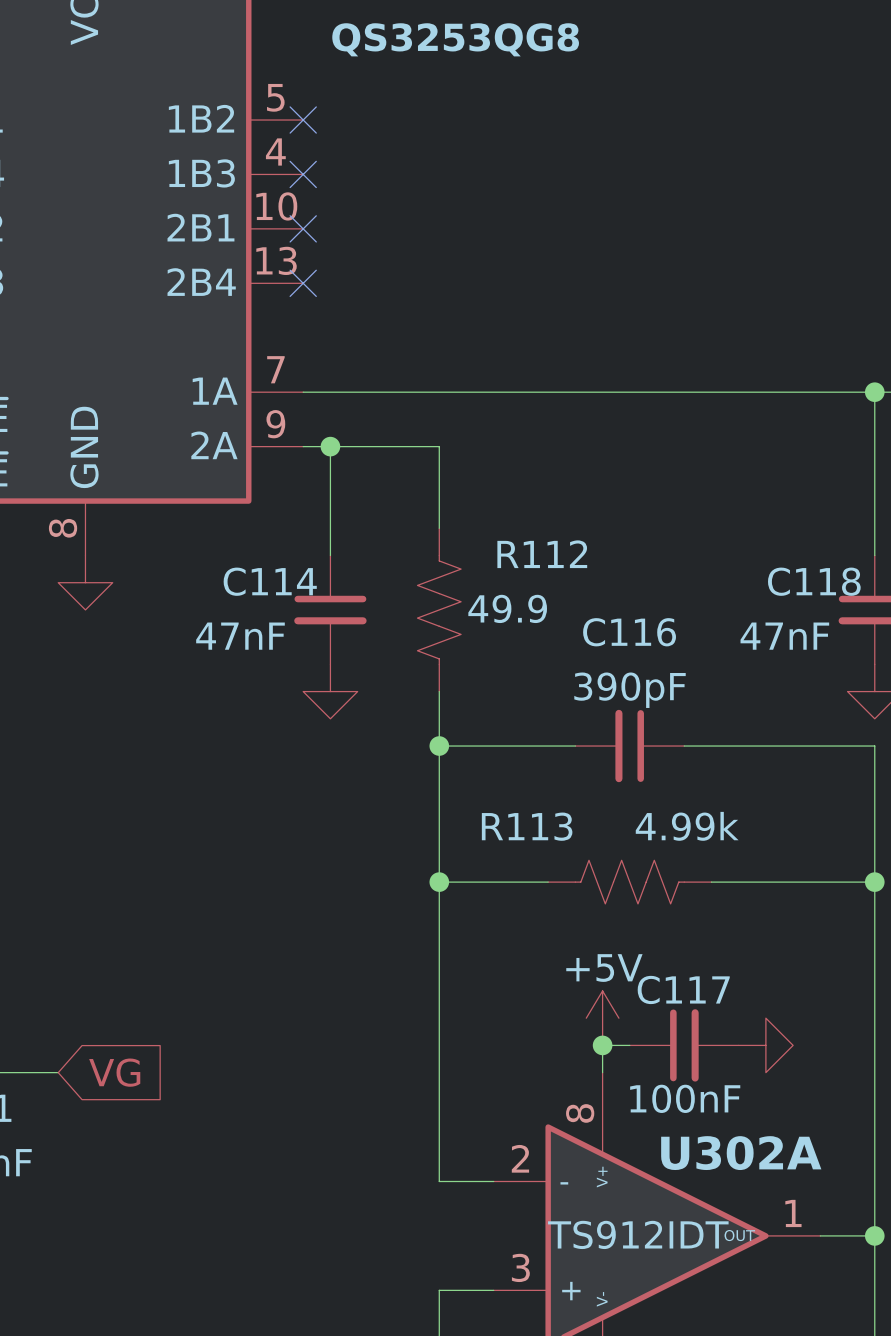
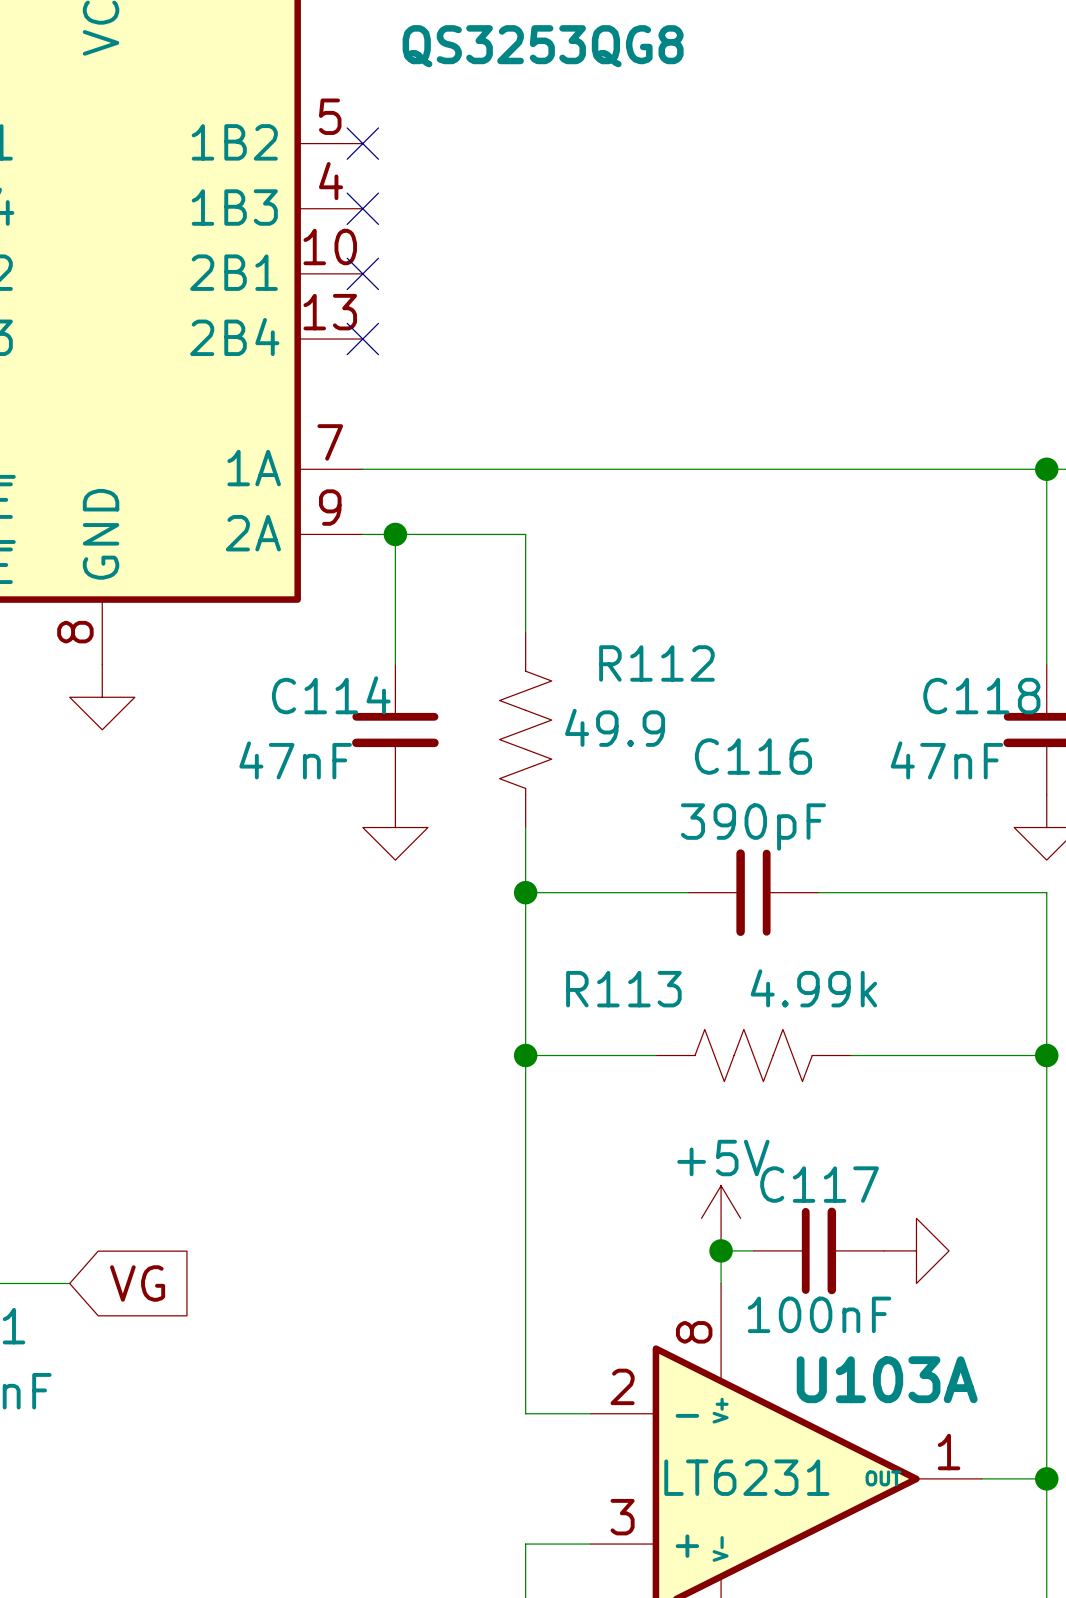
U302A name: U302A (741, 1153) -> U103A (887, 1379)
U302A value: TS912IDT (638, 1234) -> LT6231 (746, 1477)

